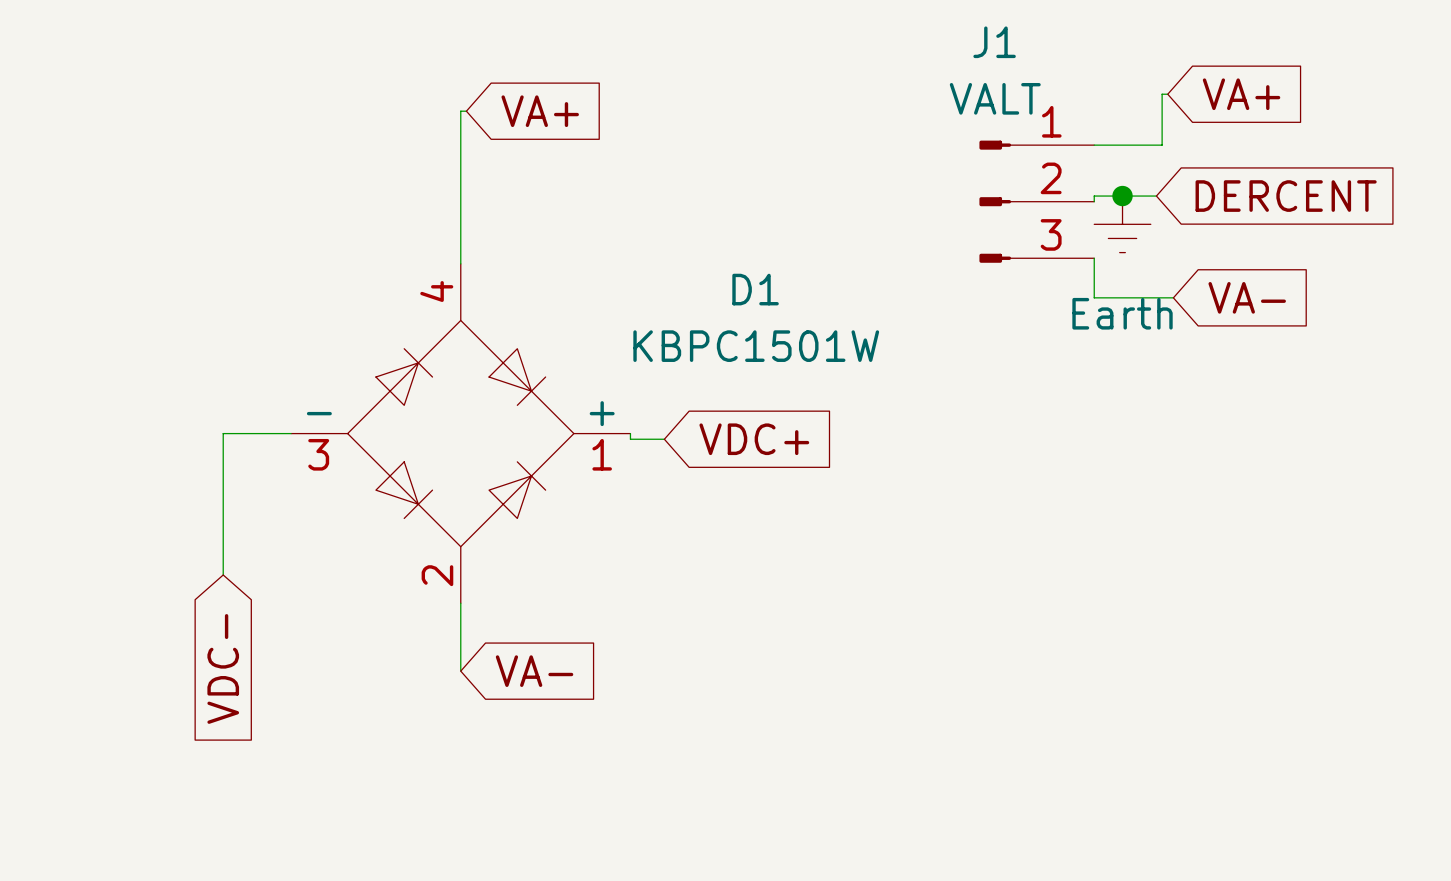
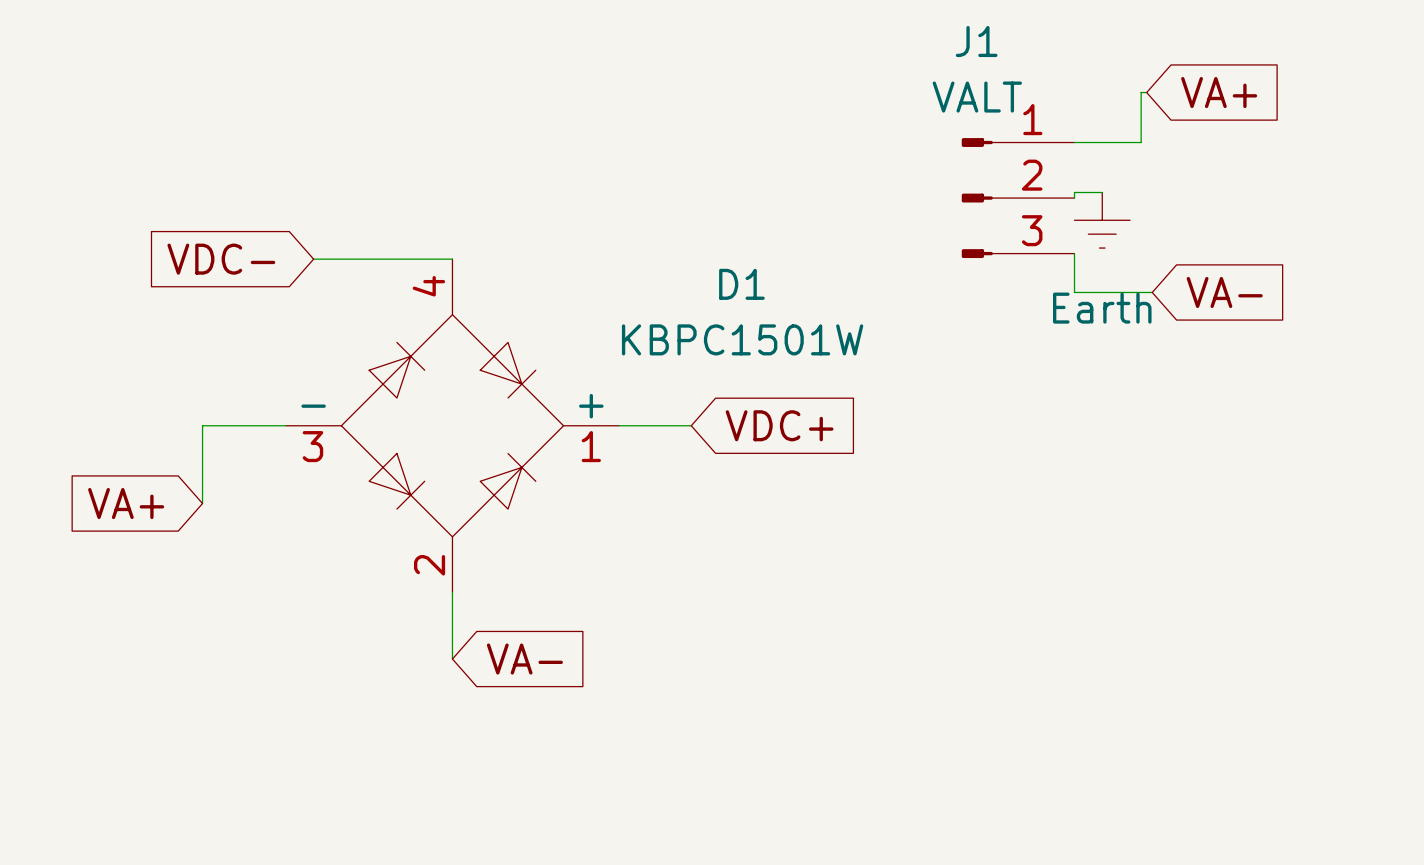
wire: (466, 111) (460, 111) (460, 263) -> (313, 259) (452, 259)
global label rotation: 0° (540, 111) -> 180° (126, 503)
global label position: VA+ (540, 111) -> VA+ (126, 503)
wire: (1122, 196) (1156, 196) -> none
junction: (1122, 196) -> none
global label: DERCENT (1286, 196) -> none
wire: (223, 433) (223, 574) -> (219, 425) (202, 425) (202, 503)
wire: (630, 433) (630, 439) (664, 439) -> (619, 425) (691, 425)
global label position: VDC+ (754, 439) -> VDC+ (779, 425)
global label rotation: 0° (223, 668) -> 90° clockwise (221, 259)
global label position: VDC- (223, 668) -> VDC- (221, 259)

